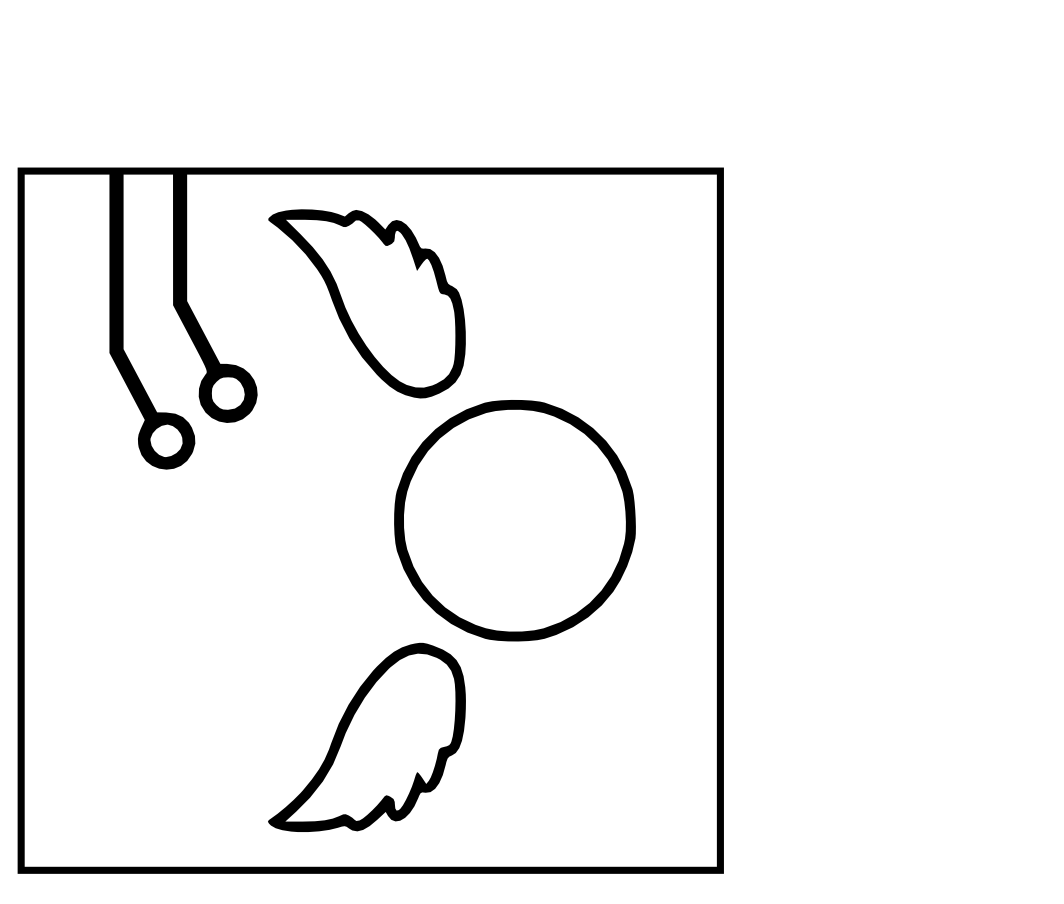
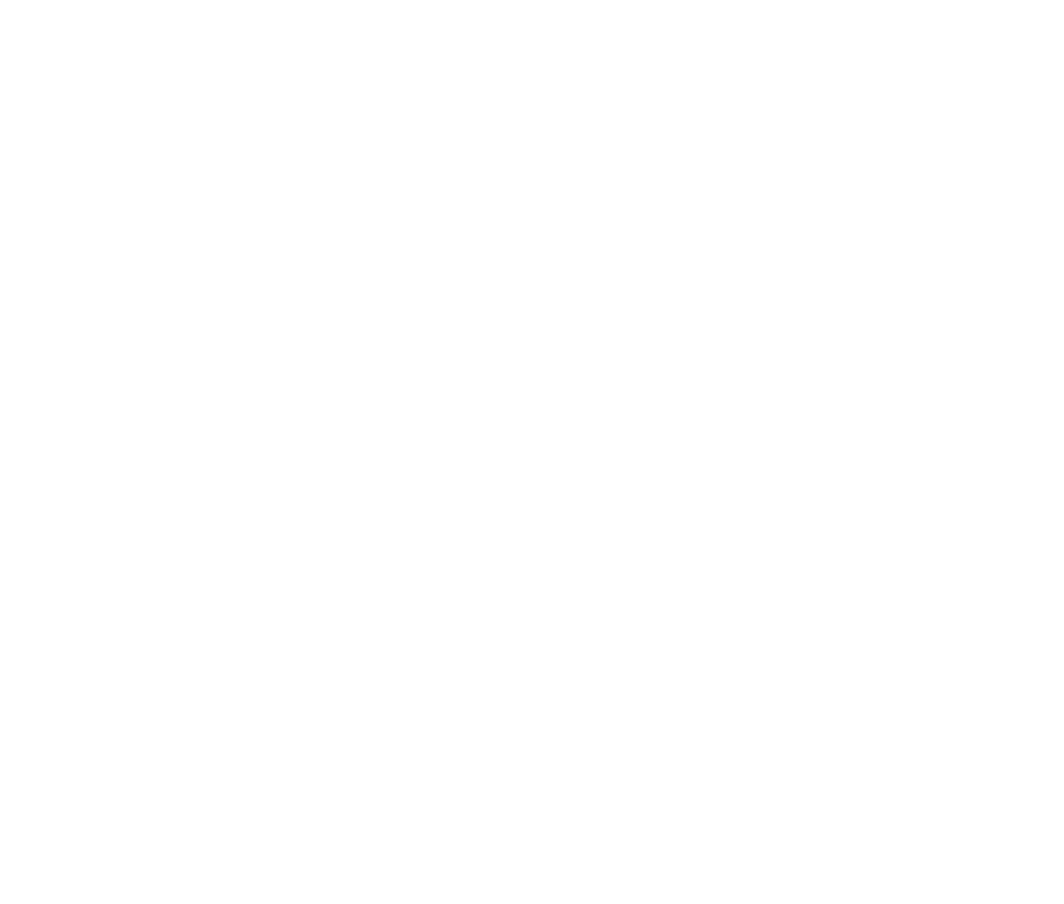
drawing: [17, 167, 724, 874] -> none

